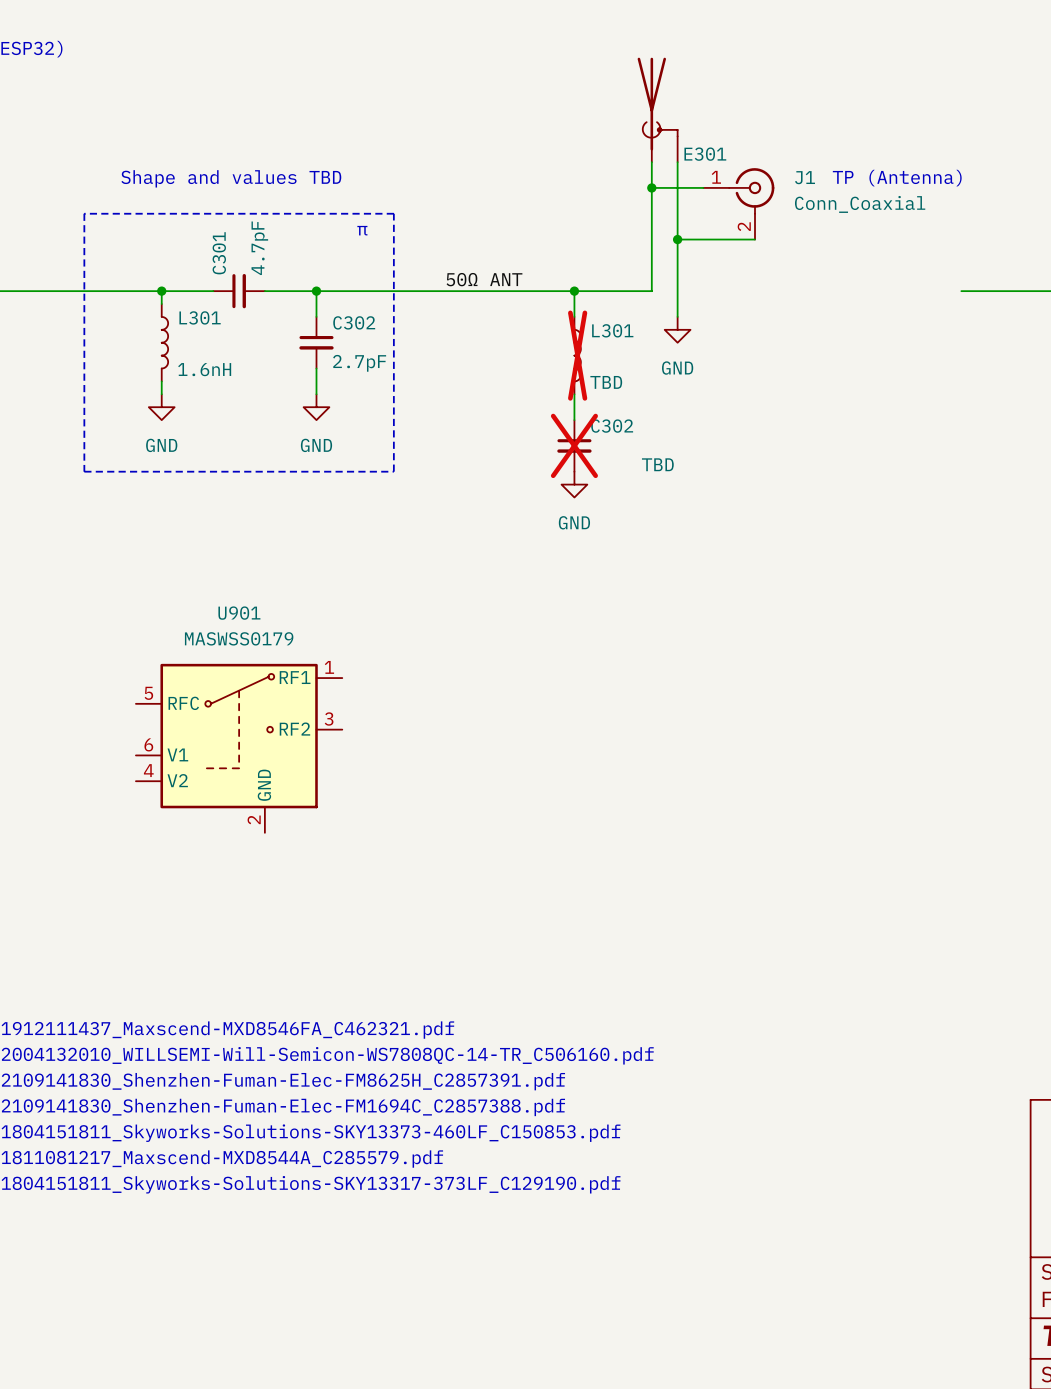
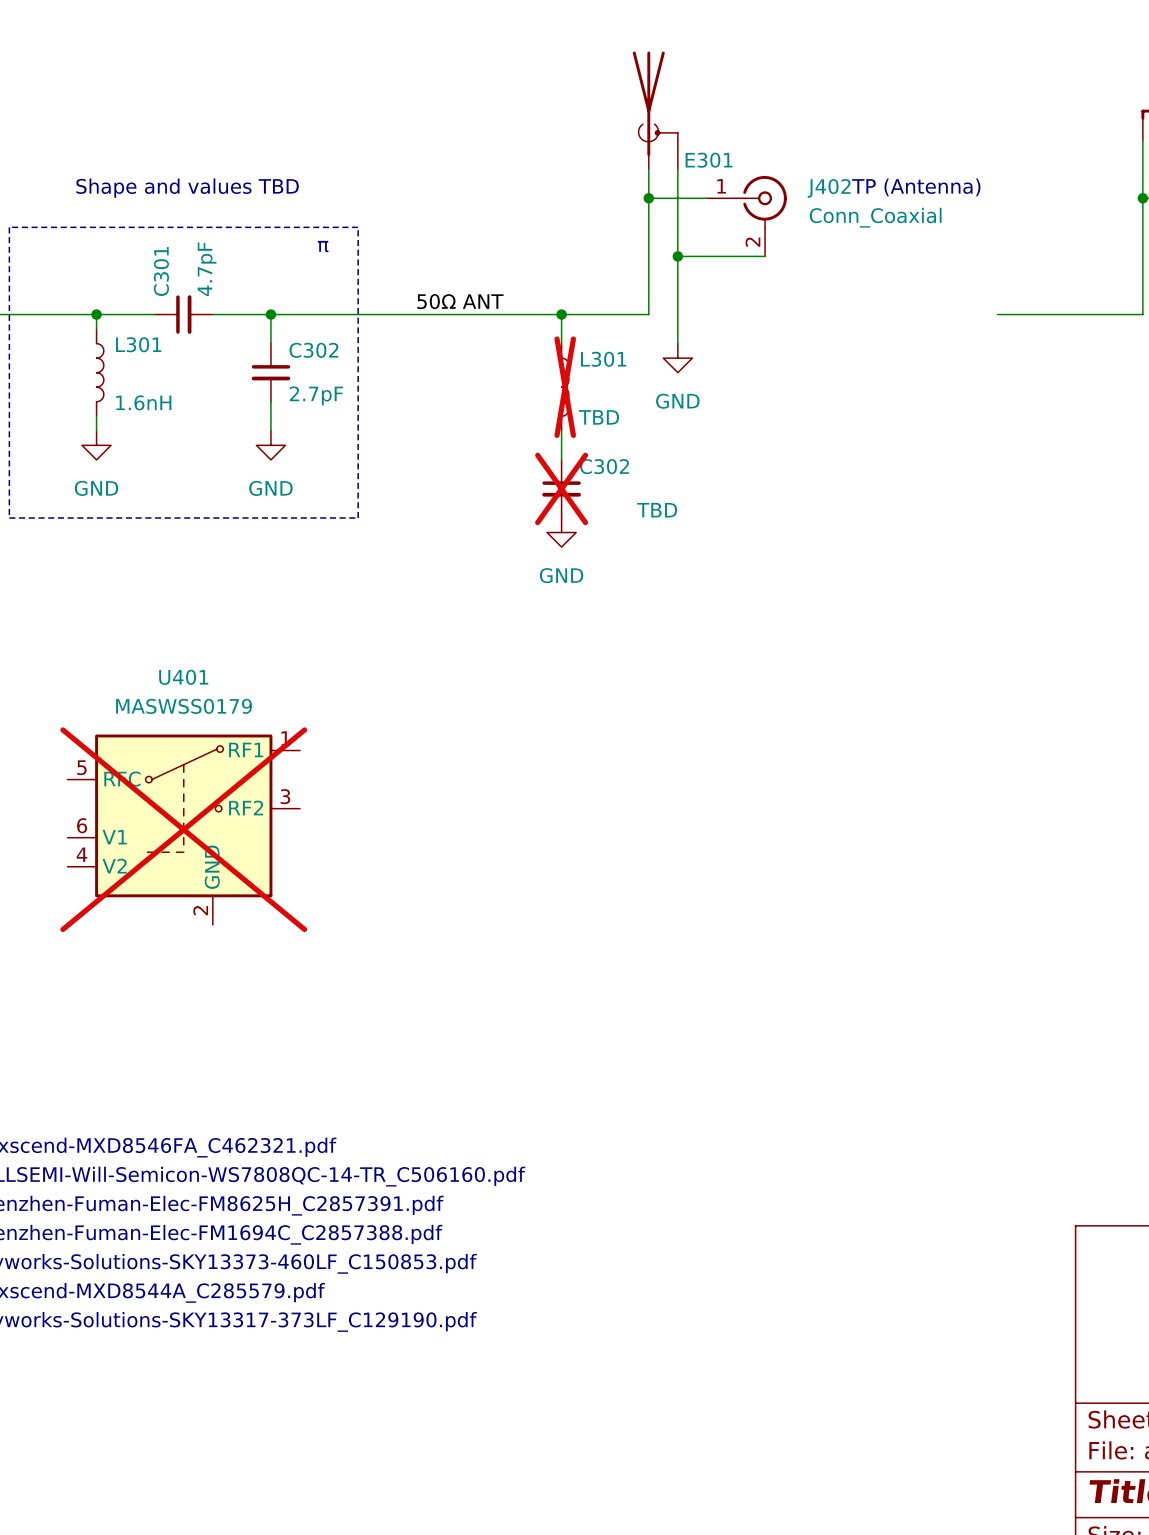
J1 name: J1 (805, 177) -> J402 (829, 188)
U901 name: U901 (239, 613) -> U401 (183, 677)
U901 do-not-place cross: none -> (183, 829)

